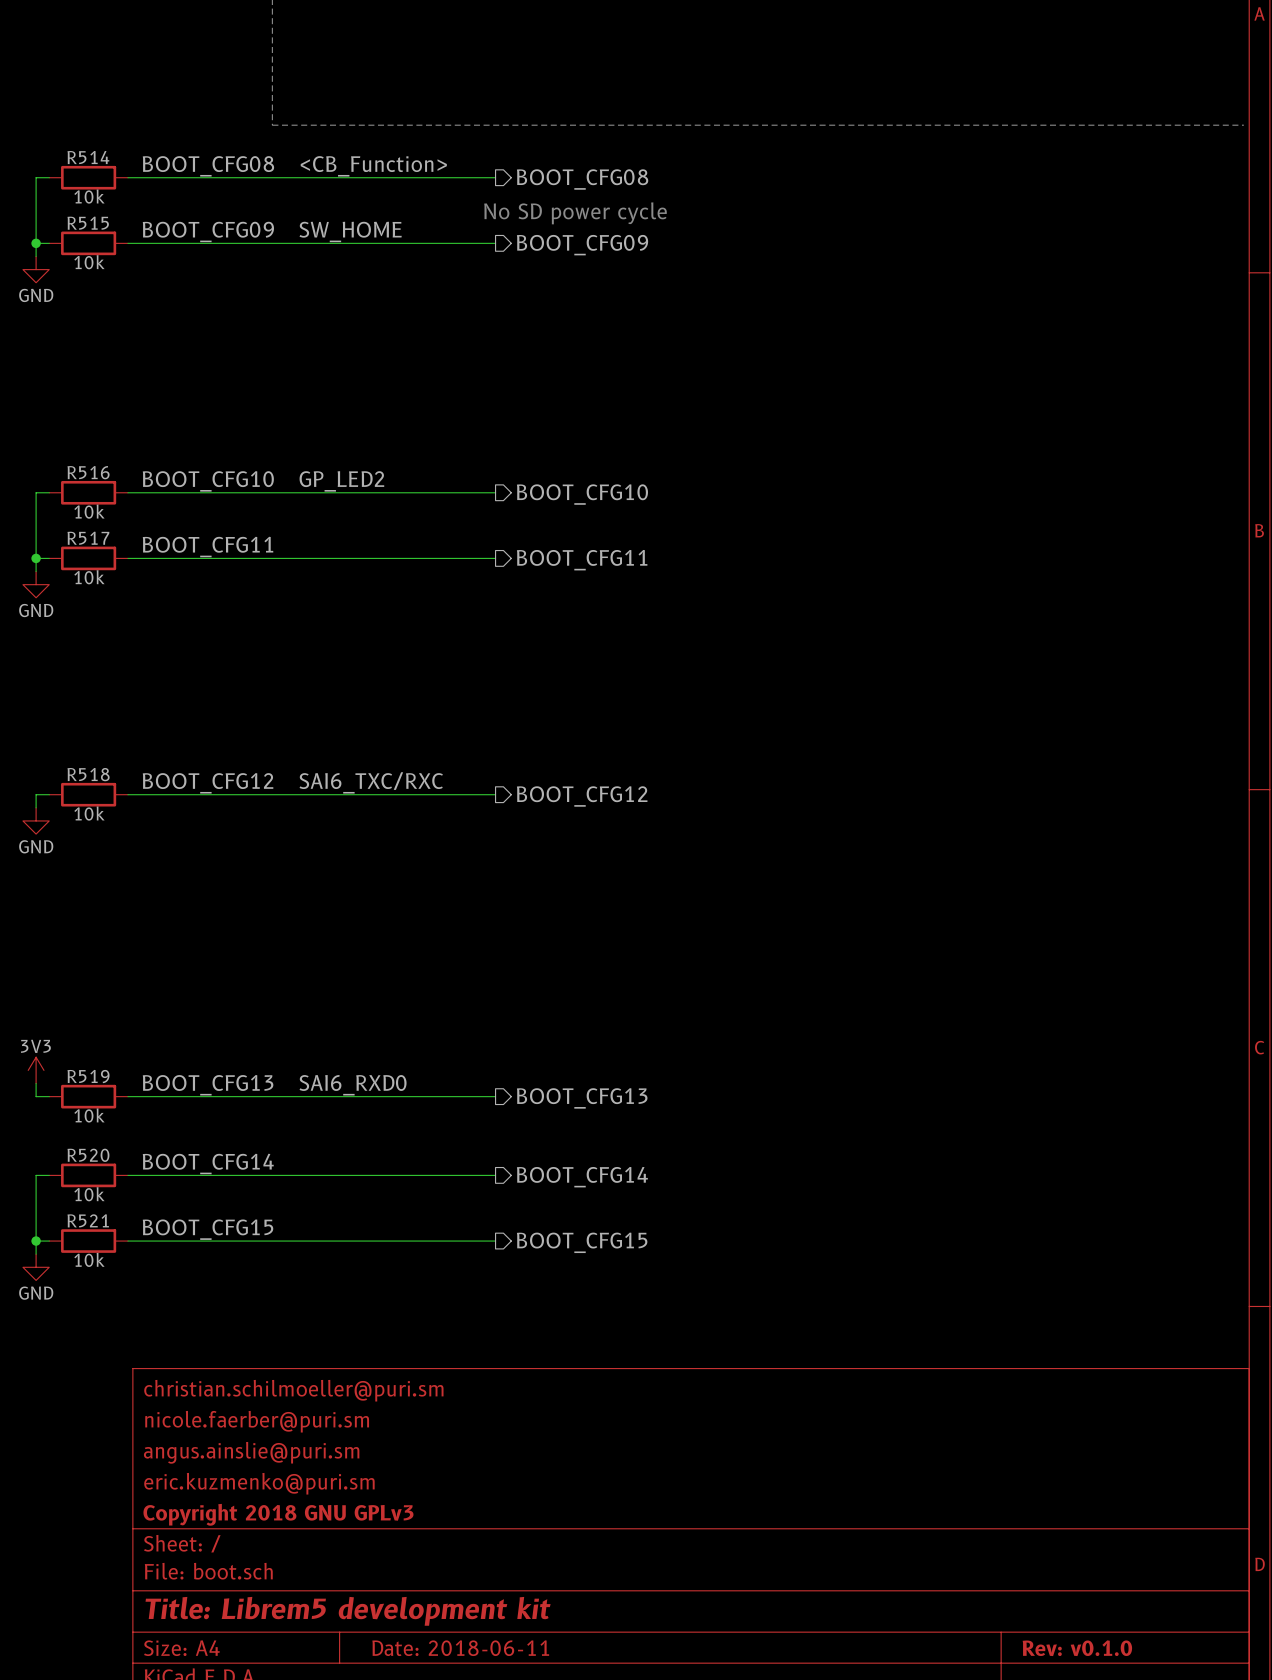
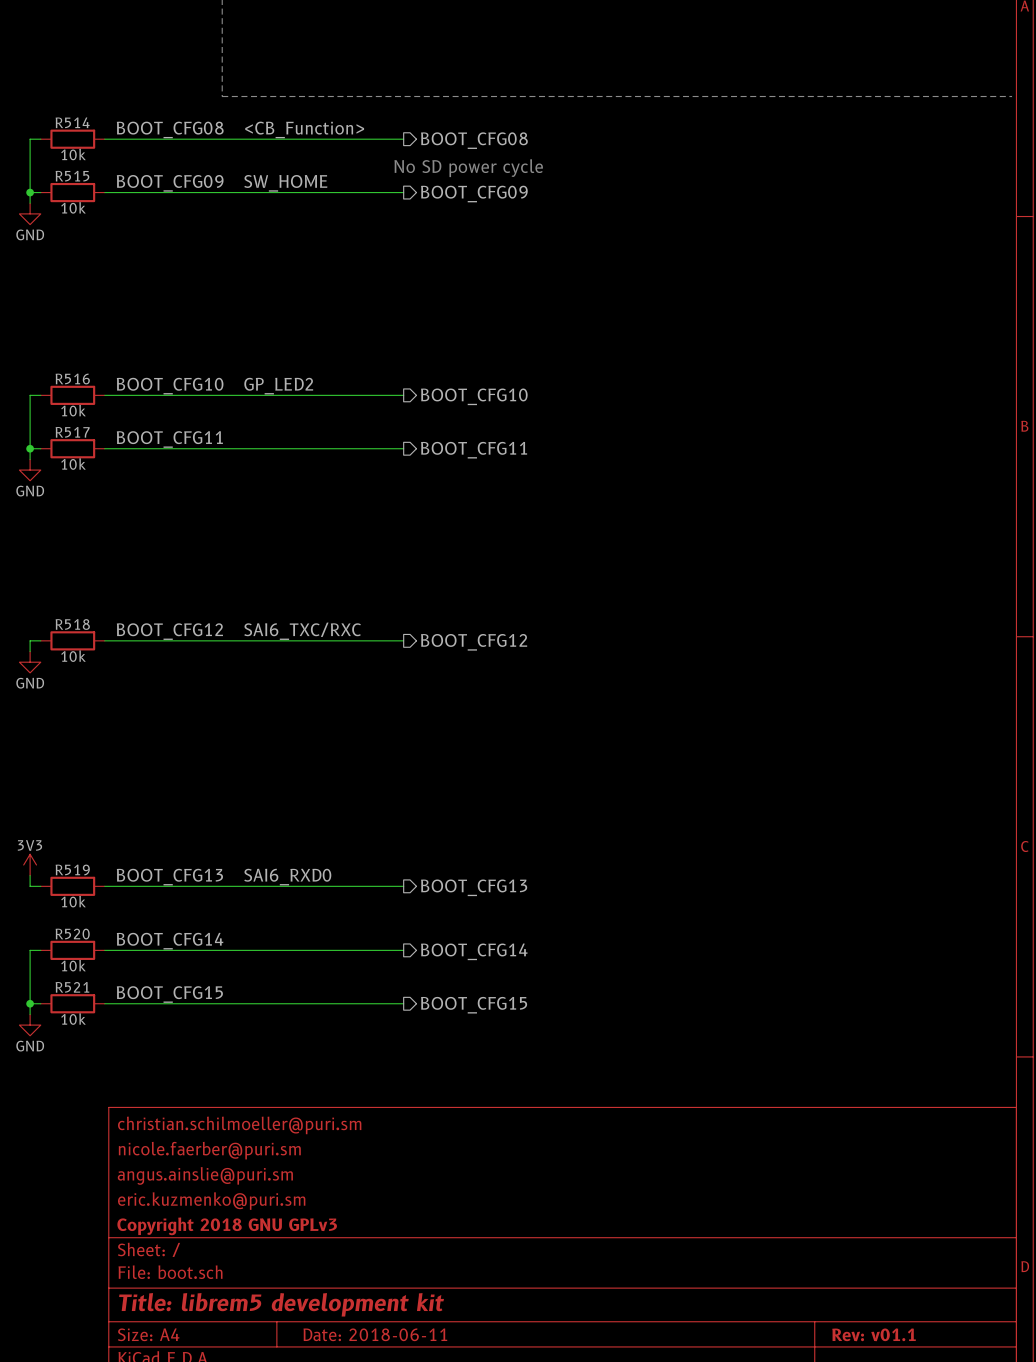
title block: Title: Librem5 development kit (348, 1611) -> Title: librem5 development kit (281, 1304)
title block: Rev: v0.1.0 (1077, 1648) -> Rev: v01.1 (874, 1334)

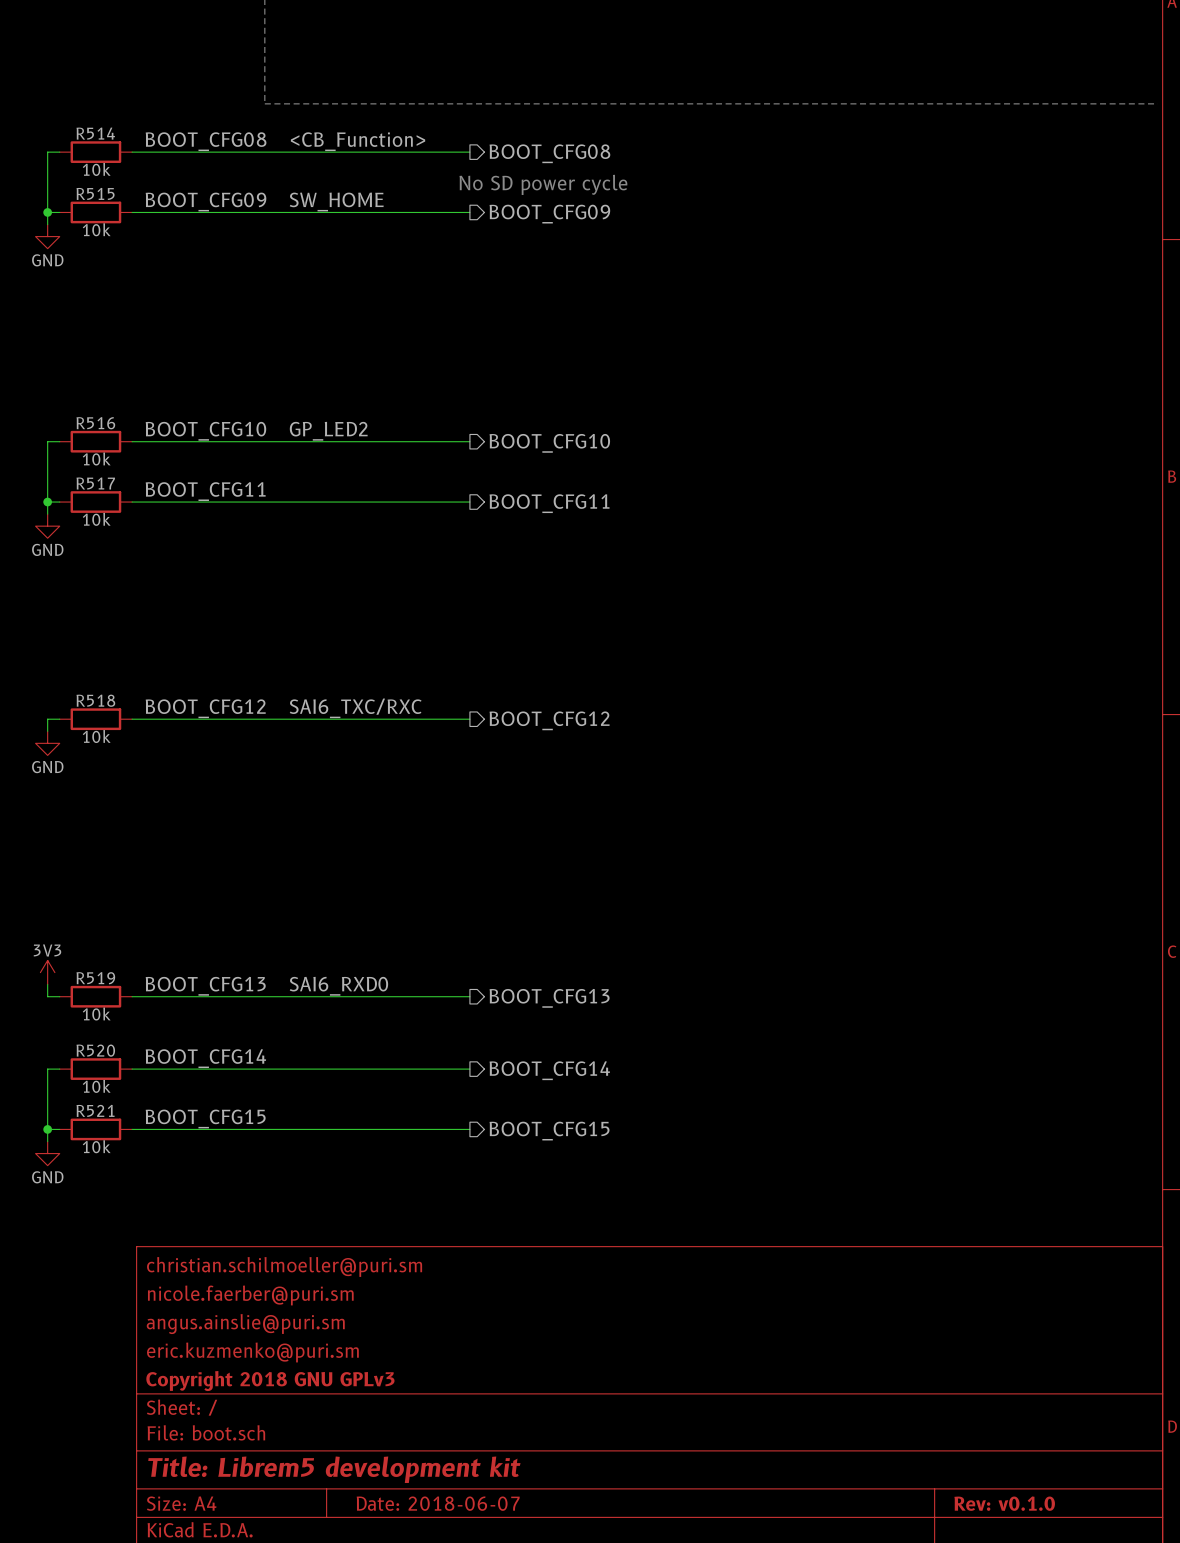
title block: Title: librem5 development kit (281, 1304) -> Title: Librem5 development kit (334, 1469)
title block: Date: 2018-06-11 (375, 1334) -> Date: 2018-06-07 (438, 1503)
title block: Rev: v01.1 (874, 1334) -> Rev: v0.1.0 (1004, 1503)

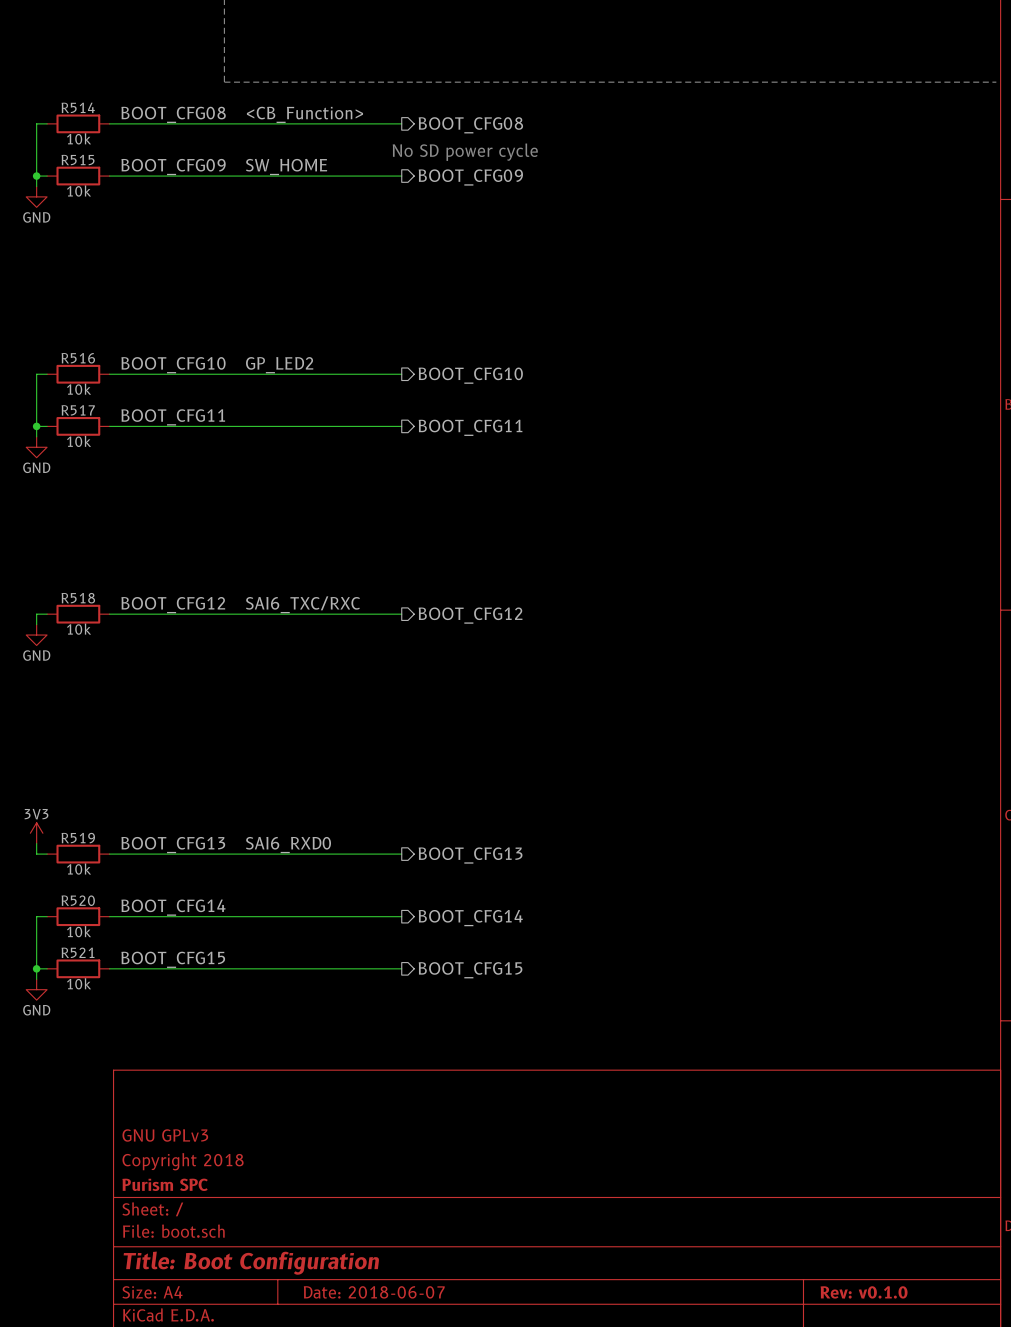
title block: christian.schilmoeller@puri.sm (284, 1266) -> none
title block: nicole.faerber@puri.sm (250, 1295) -> none
title block: angus.ainslie@puri.sm (245, 1324) -> GNU GPLv3 (165, 1135)
title block: eric.kuzmenko@puri.sm (252, 1352) -> Copyright 2018 (183, 1161)
title block: Copyright 2018 GNU GPLv3 (270, 1381) -> Purism SPC (165, 1184)
title block: Title: Librem5 development kit (334, 1469) -> Title: Boot Configuration (251, 1263)

